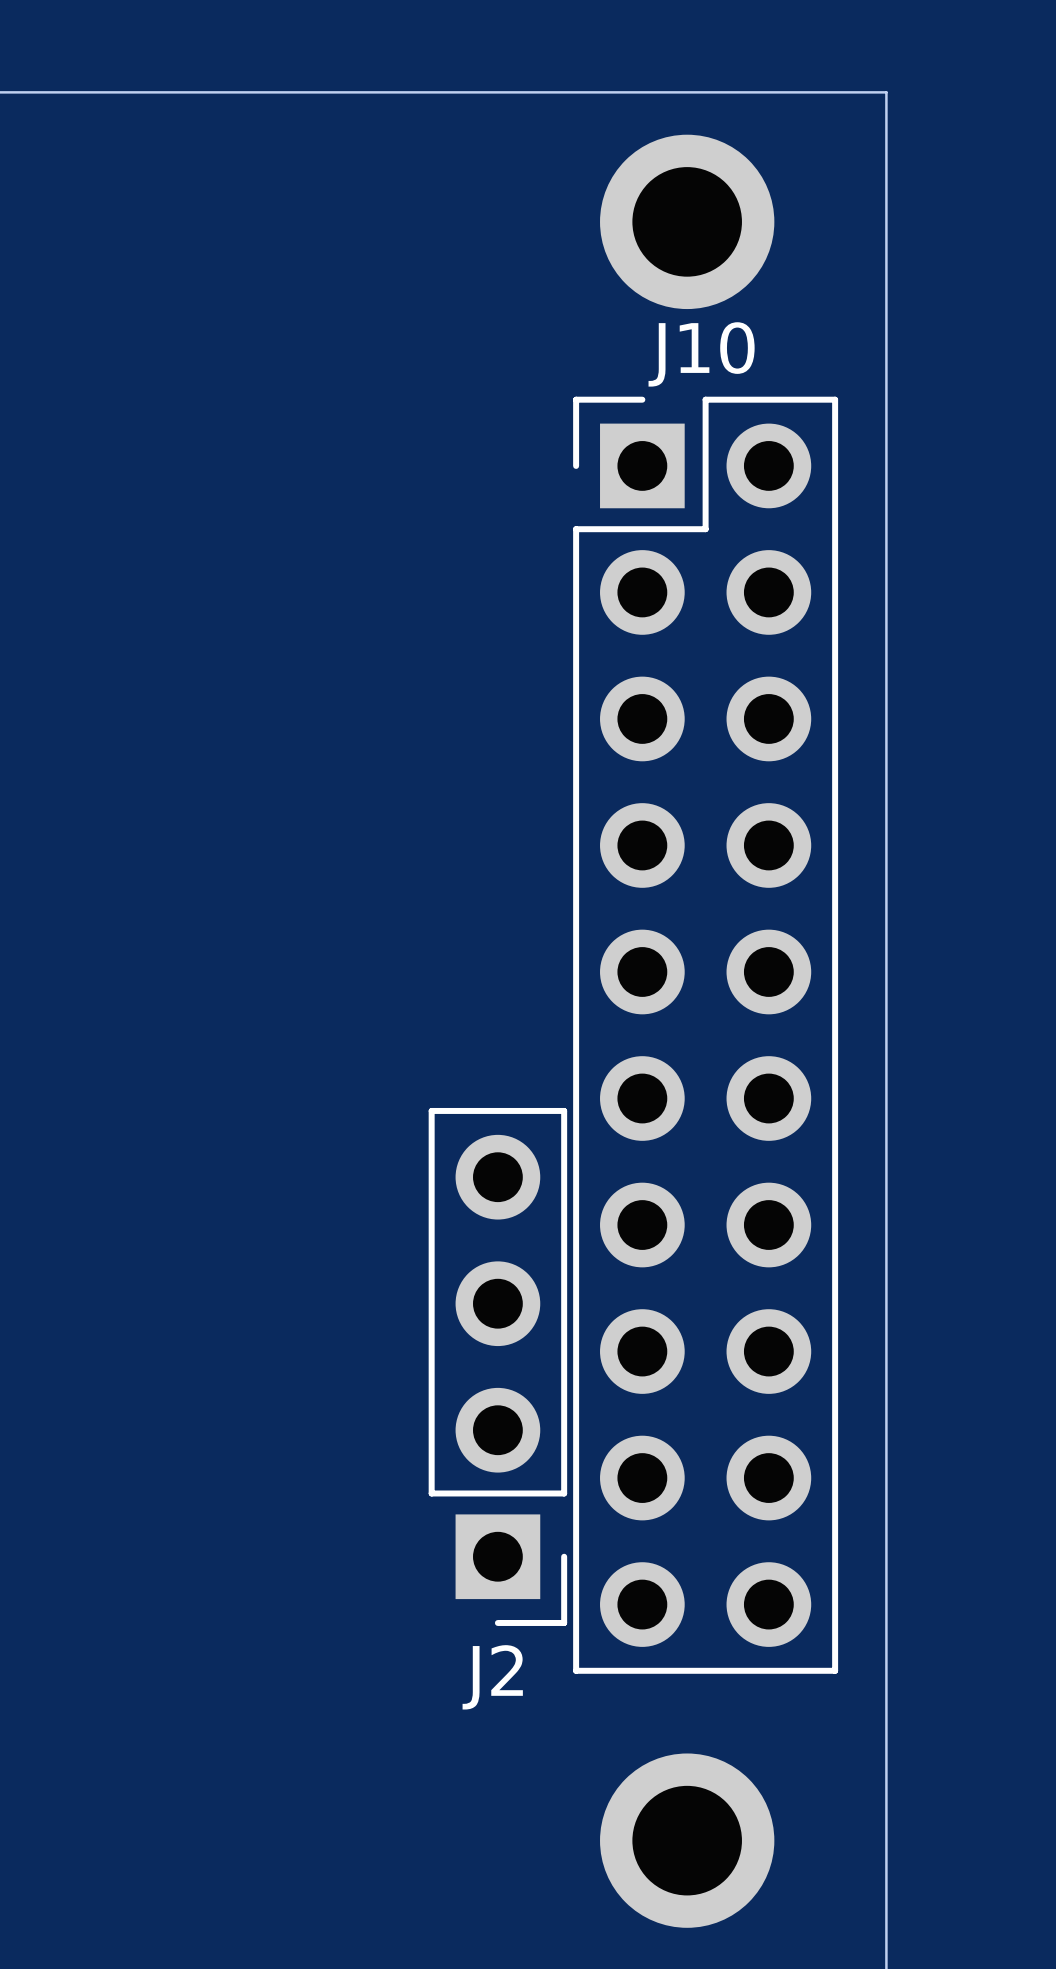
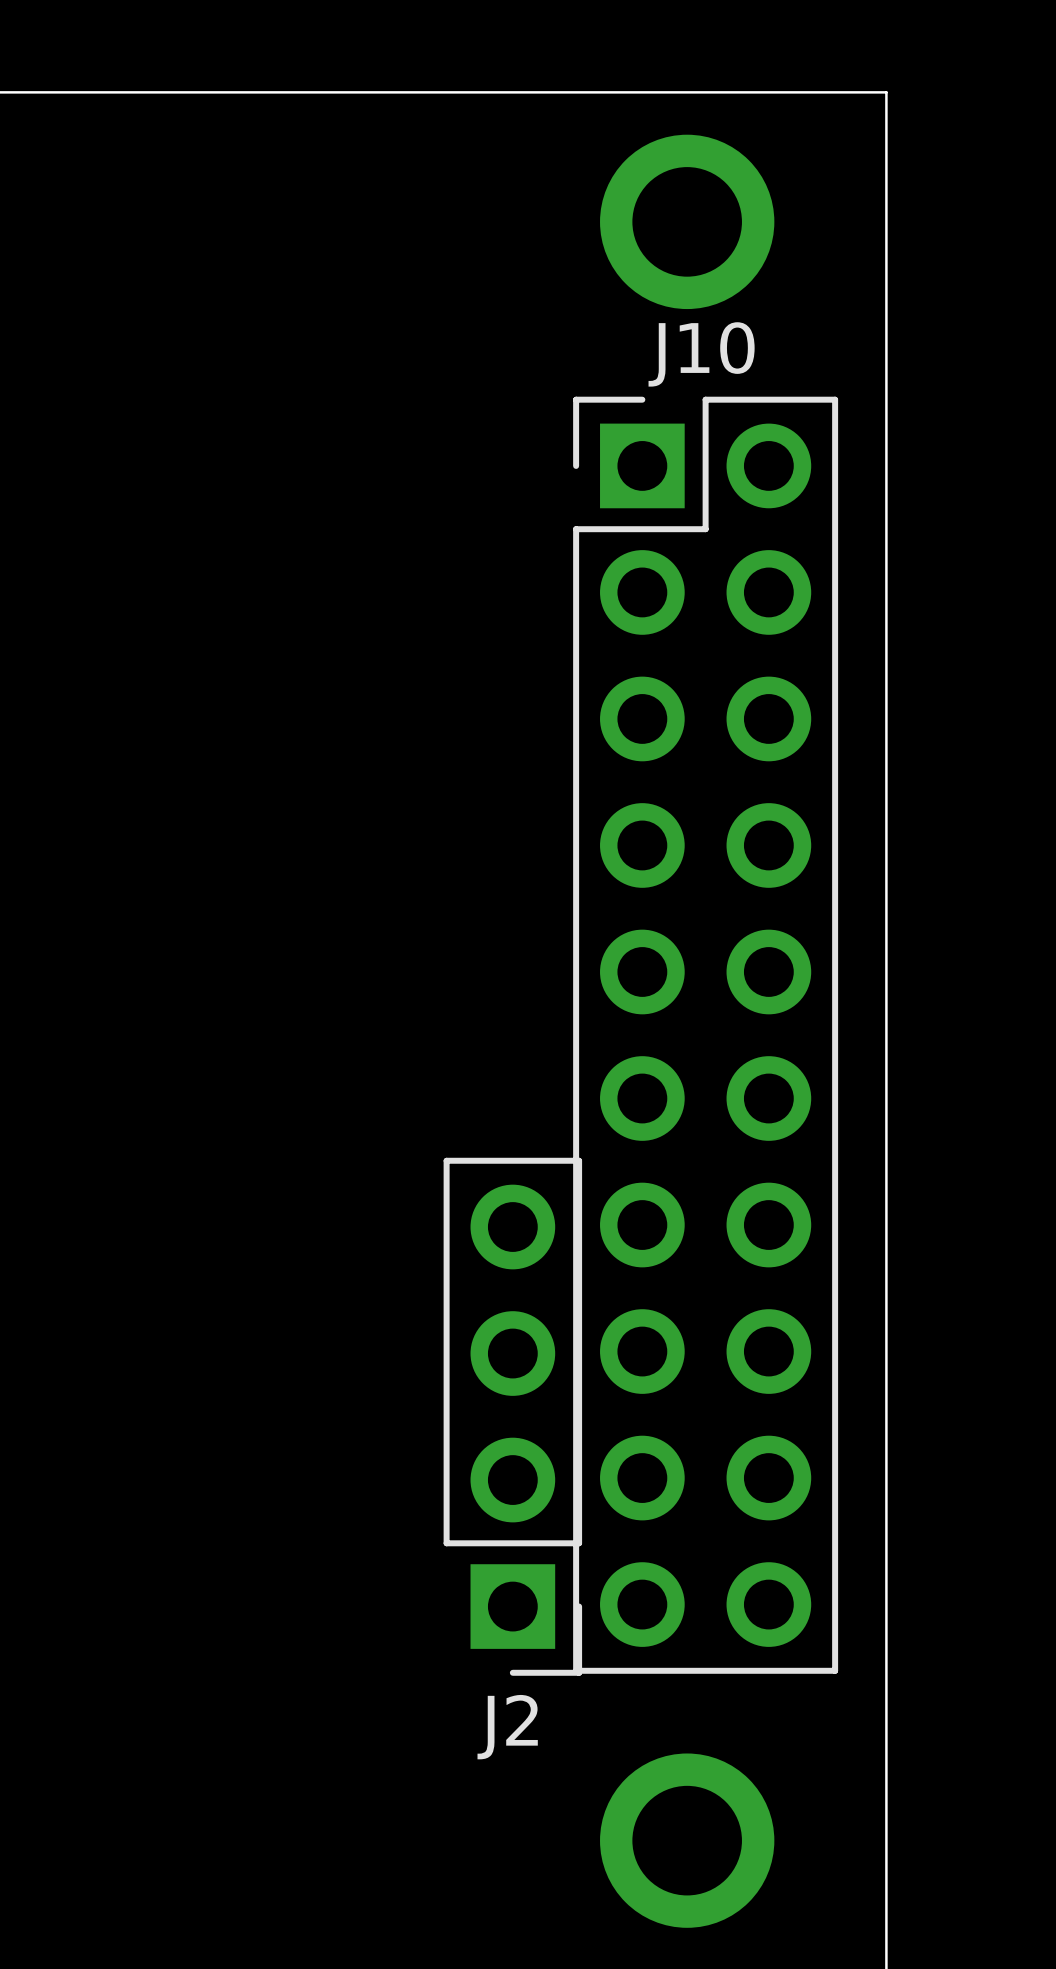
J2 position: (497, 1366) -> (512, 1416)

